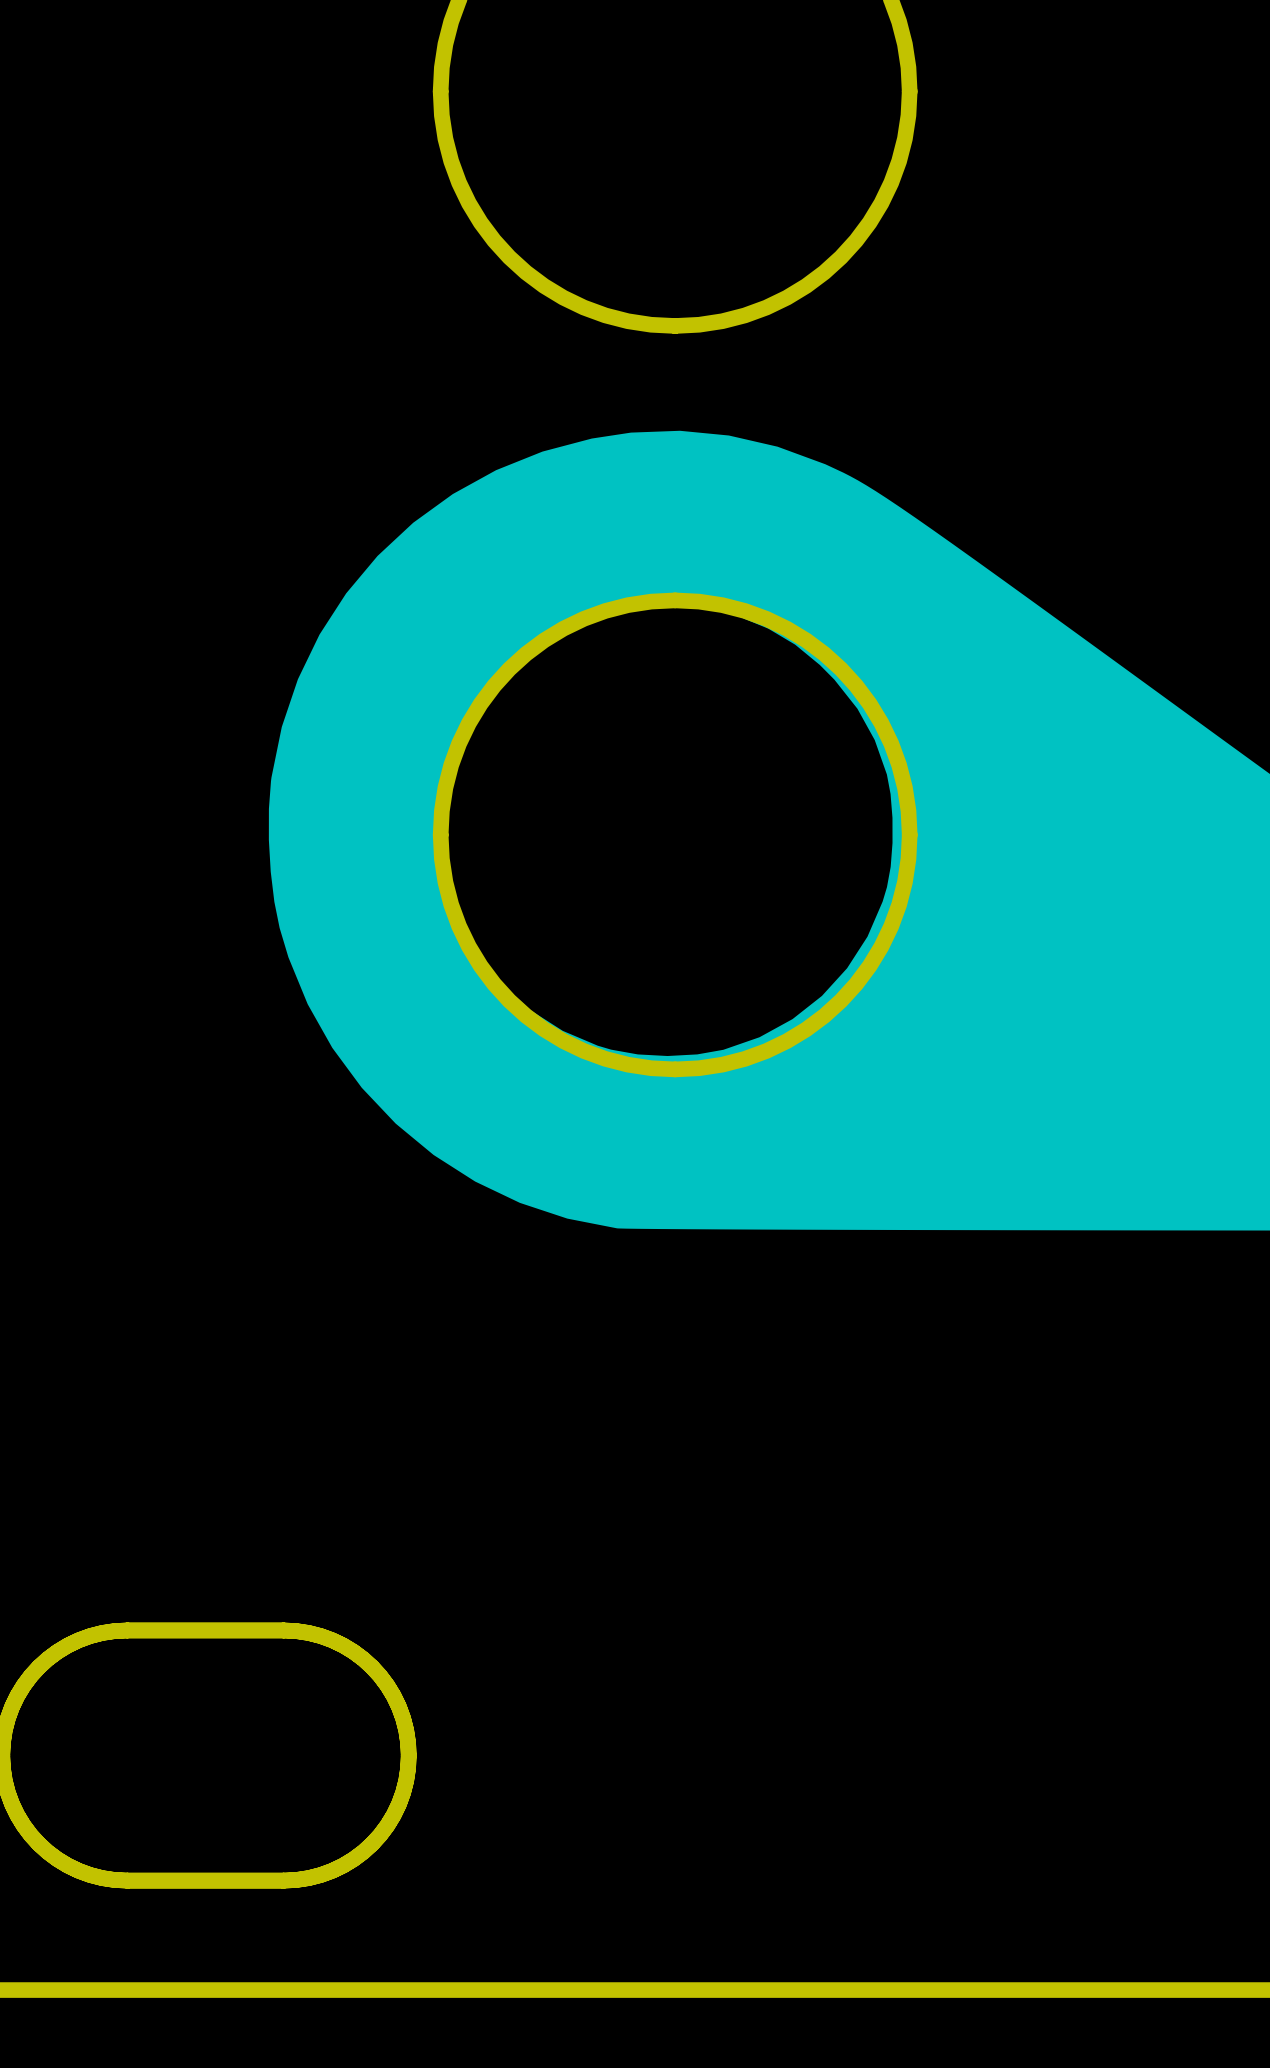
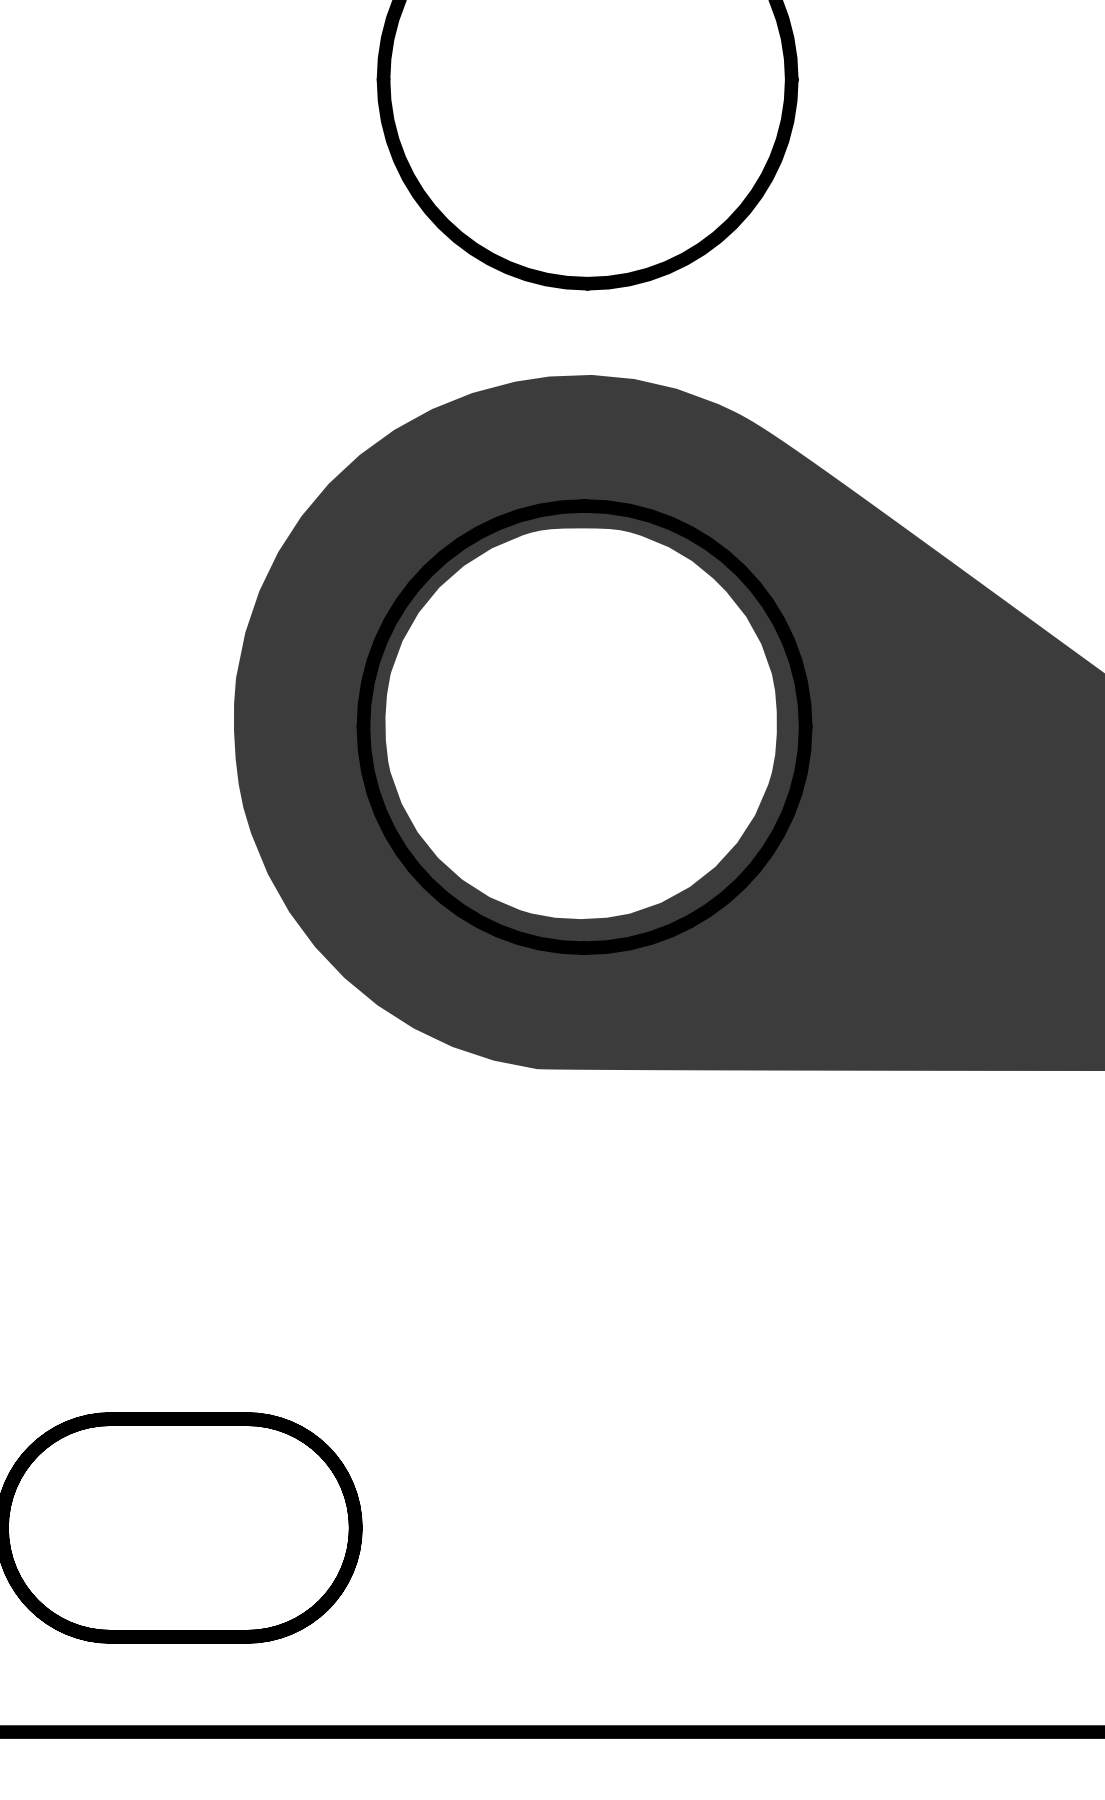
board edge: (675, 600) (722, 605) (766, 618) (806, 640) (841, 669) (869, 703) (891, 743) (904, 787) (909, 834) (904, 882) (891, 926) (869, 966) (841, 1000) (806, 1029) (766, 1050) (722, 1064) (675, 1069) (627, 1064) (583, 1050) (544, 1029) (509, 1000) (480, 966) (459, 926) (445, 882) (440, 834) (445, 787) (459, 743) (480, 703) (509, 669) (544, 640) (583, 618) (627, 605) (675, 600) -> (584, 505) (539, 510) (498, 523) (460, 543) (428, 570) (401, 603) (380, 641) (367, 682) (363, 727) (367, 771) (380, 813) (401, 850) (428, 883) (460, 910) (498, 930) (539, 943) (584, 948) (629, 943) (670, 930) (708, 910) (740, 883) (767, 850) (788, 813) (801, 771) (805, 727) (801, 682) (788, 641) (767, 603) (740, 570) (708, 543) (670, 523) (629, 510) (584, 505)

